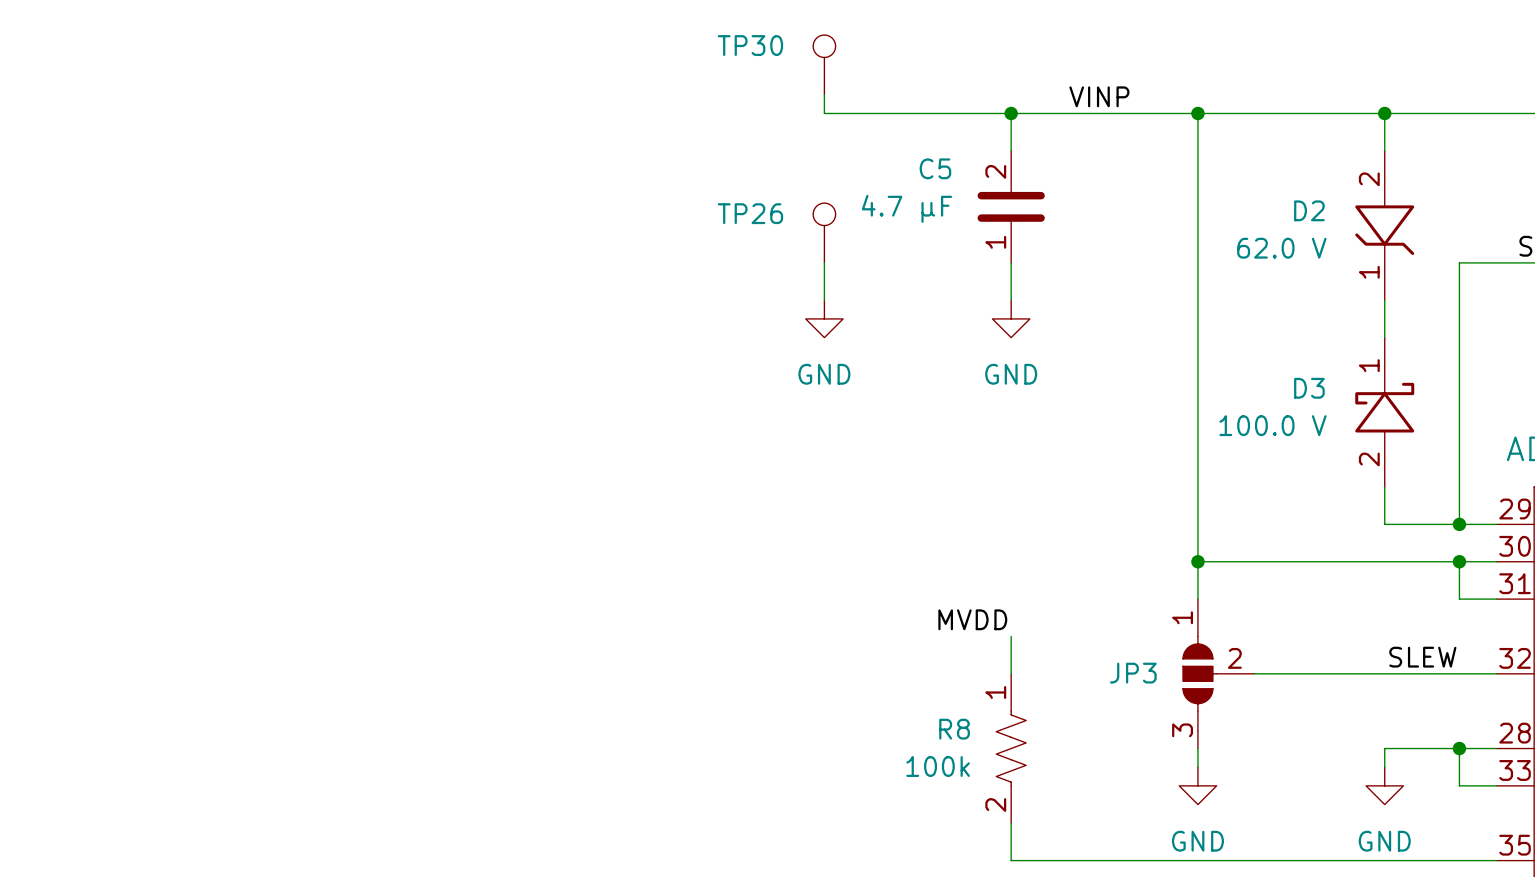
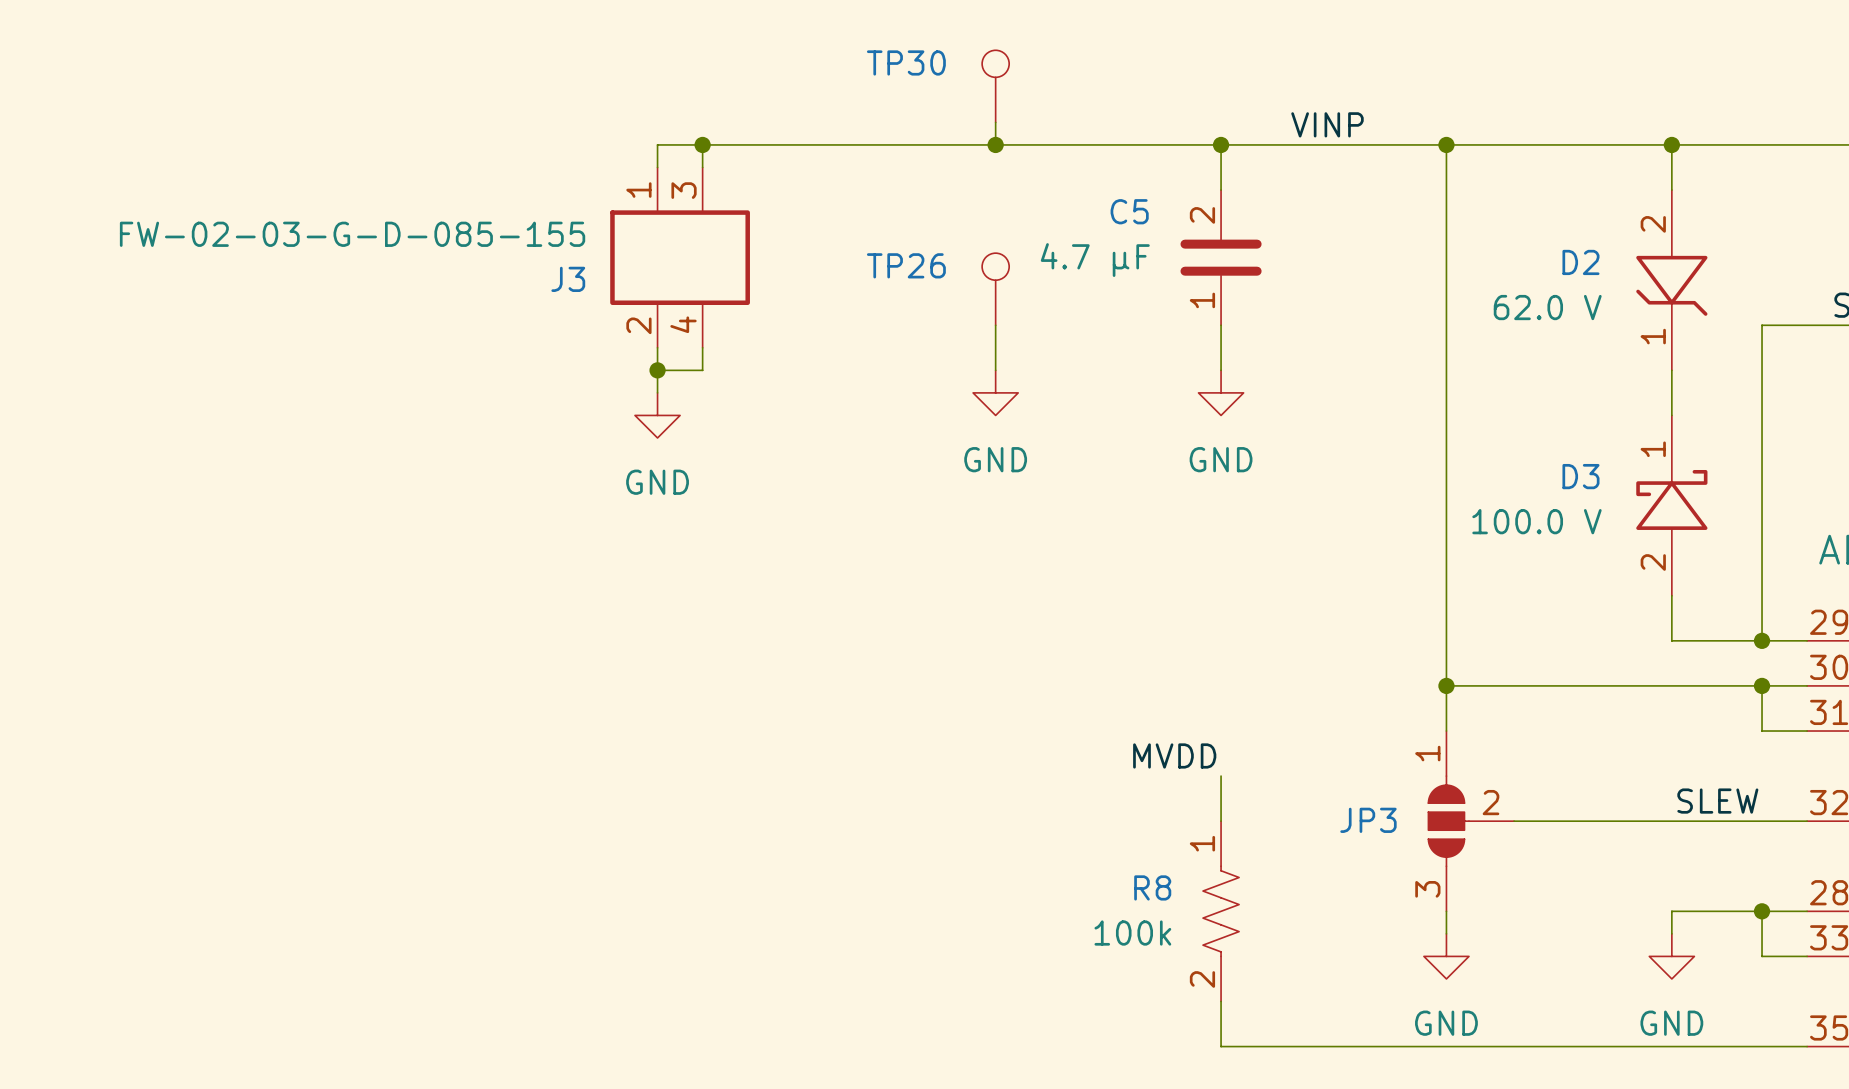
wire: none -> (702, 144) (702, 167)
junction: none -> (702, 144)
wire: none -> (995, 144) (657, 144) (657, 167)
junction: none -> (995, 144)
J3: none -> FW-02-03-G-D-085-155 (680, 257)
wire: none -> (657, 347) (657, 392)
wire: none -> (702, 347) (702, 370) (657, 370)
junction: none -> (657, 370)
power symbol: none -> GND (657, 415)

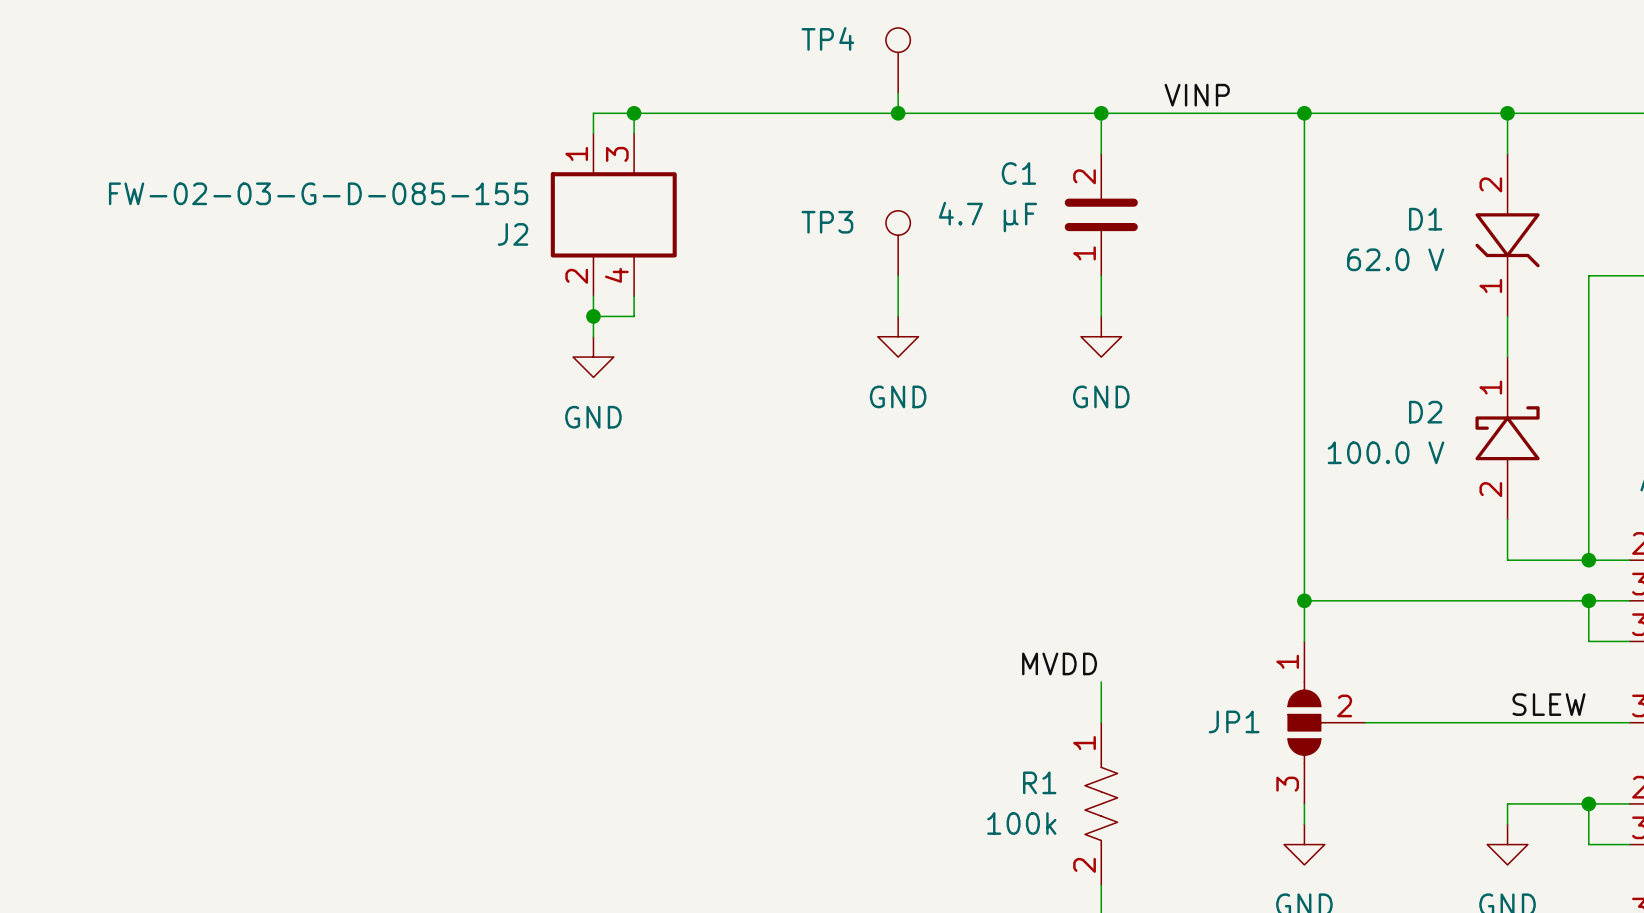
TP30 name: TP30 (906, 62) -> TP4 (827, 38)
C5 name: C5 (1129, 211) -> C1 (1018, 173)
D2 name: D2 (1580, 262) -> D1 (1425, 219)
TP26 name: TP26 (906, 265) -> TP3 (827, 222)
J3 name: J3 (568, 279) -> J2 (513, 234)
D3 name: D3 (1580, 476) -> D2 (1425, 412)
JP3 name: JP3 (1368, 820) -> JP1 (1234, 721)
R8 name: R8 (1152, 887) -> R1 (1039, 782)

